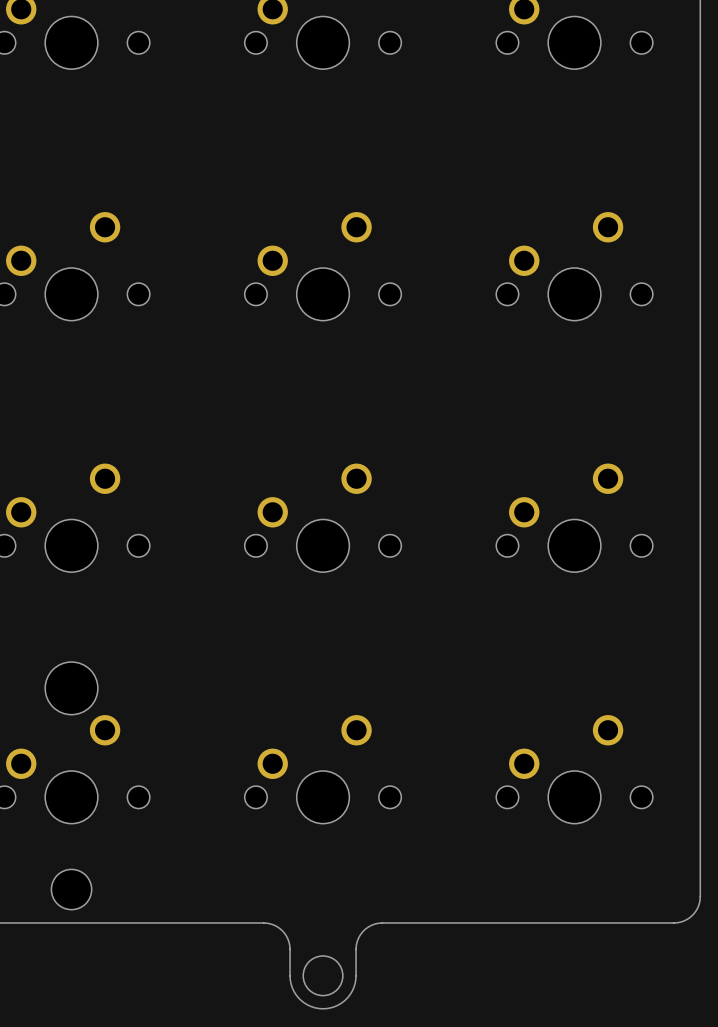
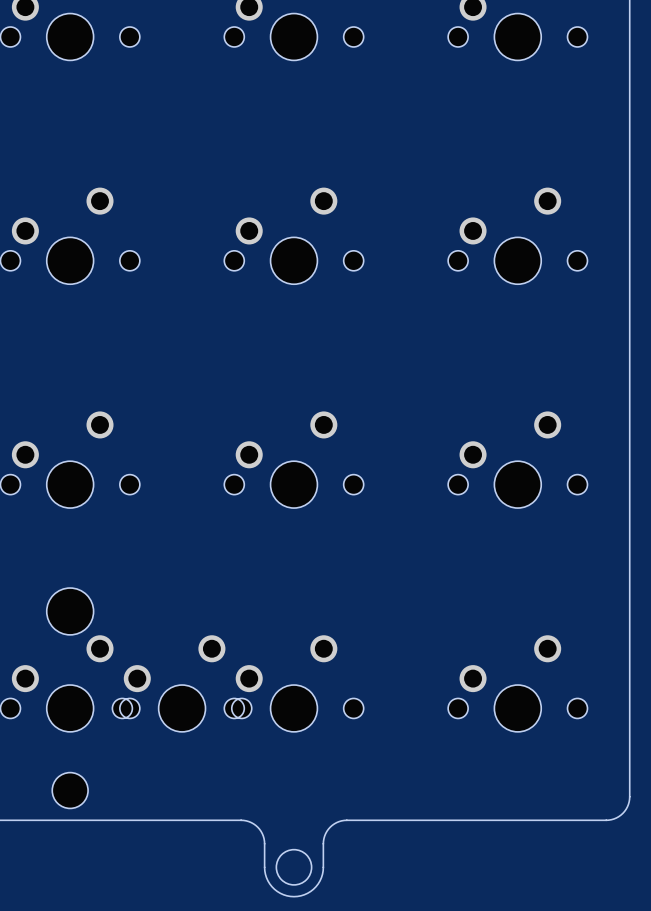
part: none -> (182, 683)

